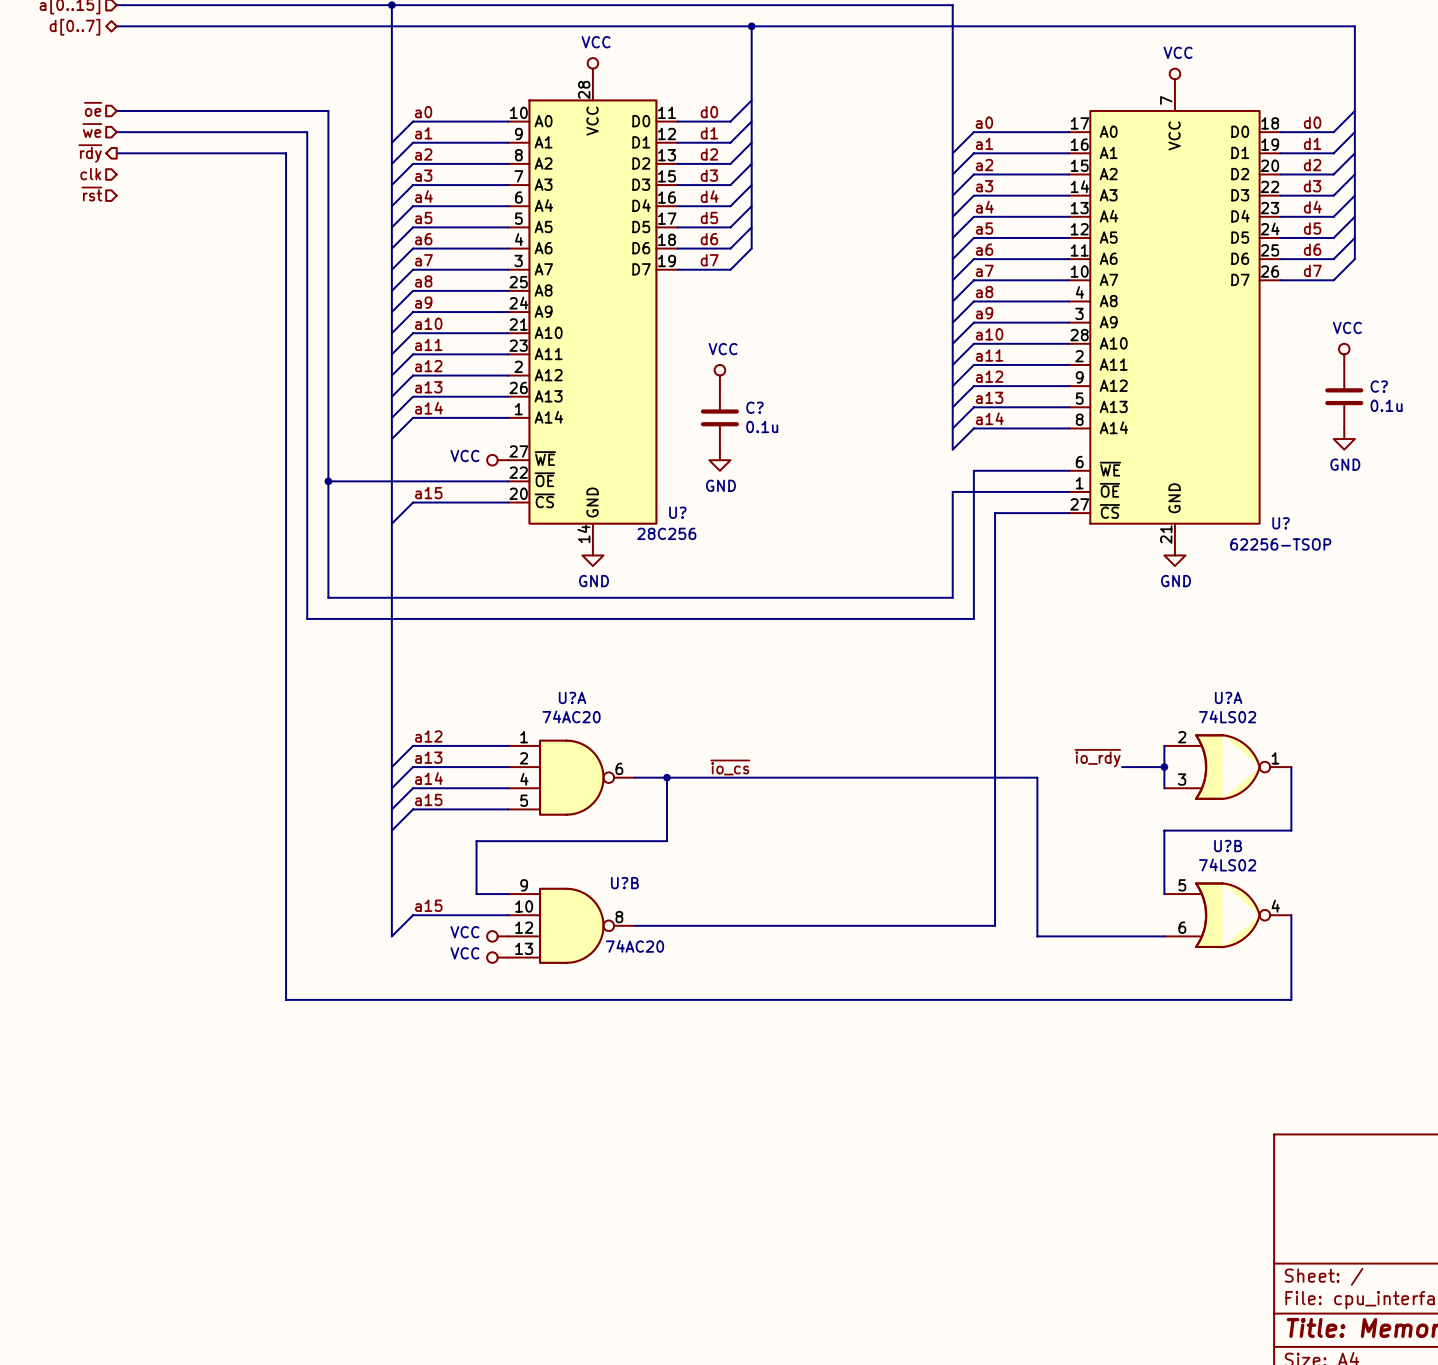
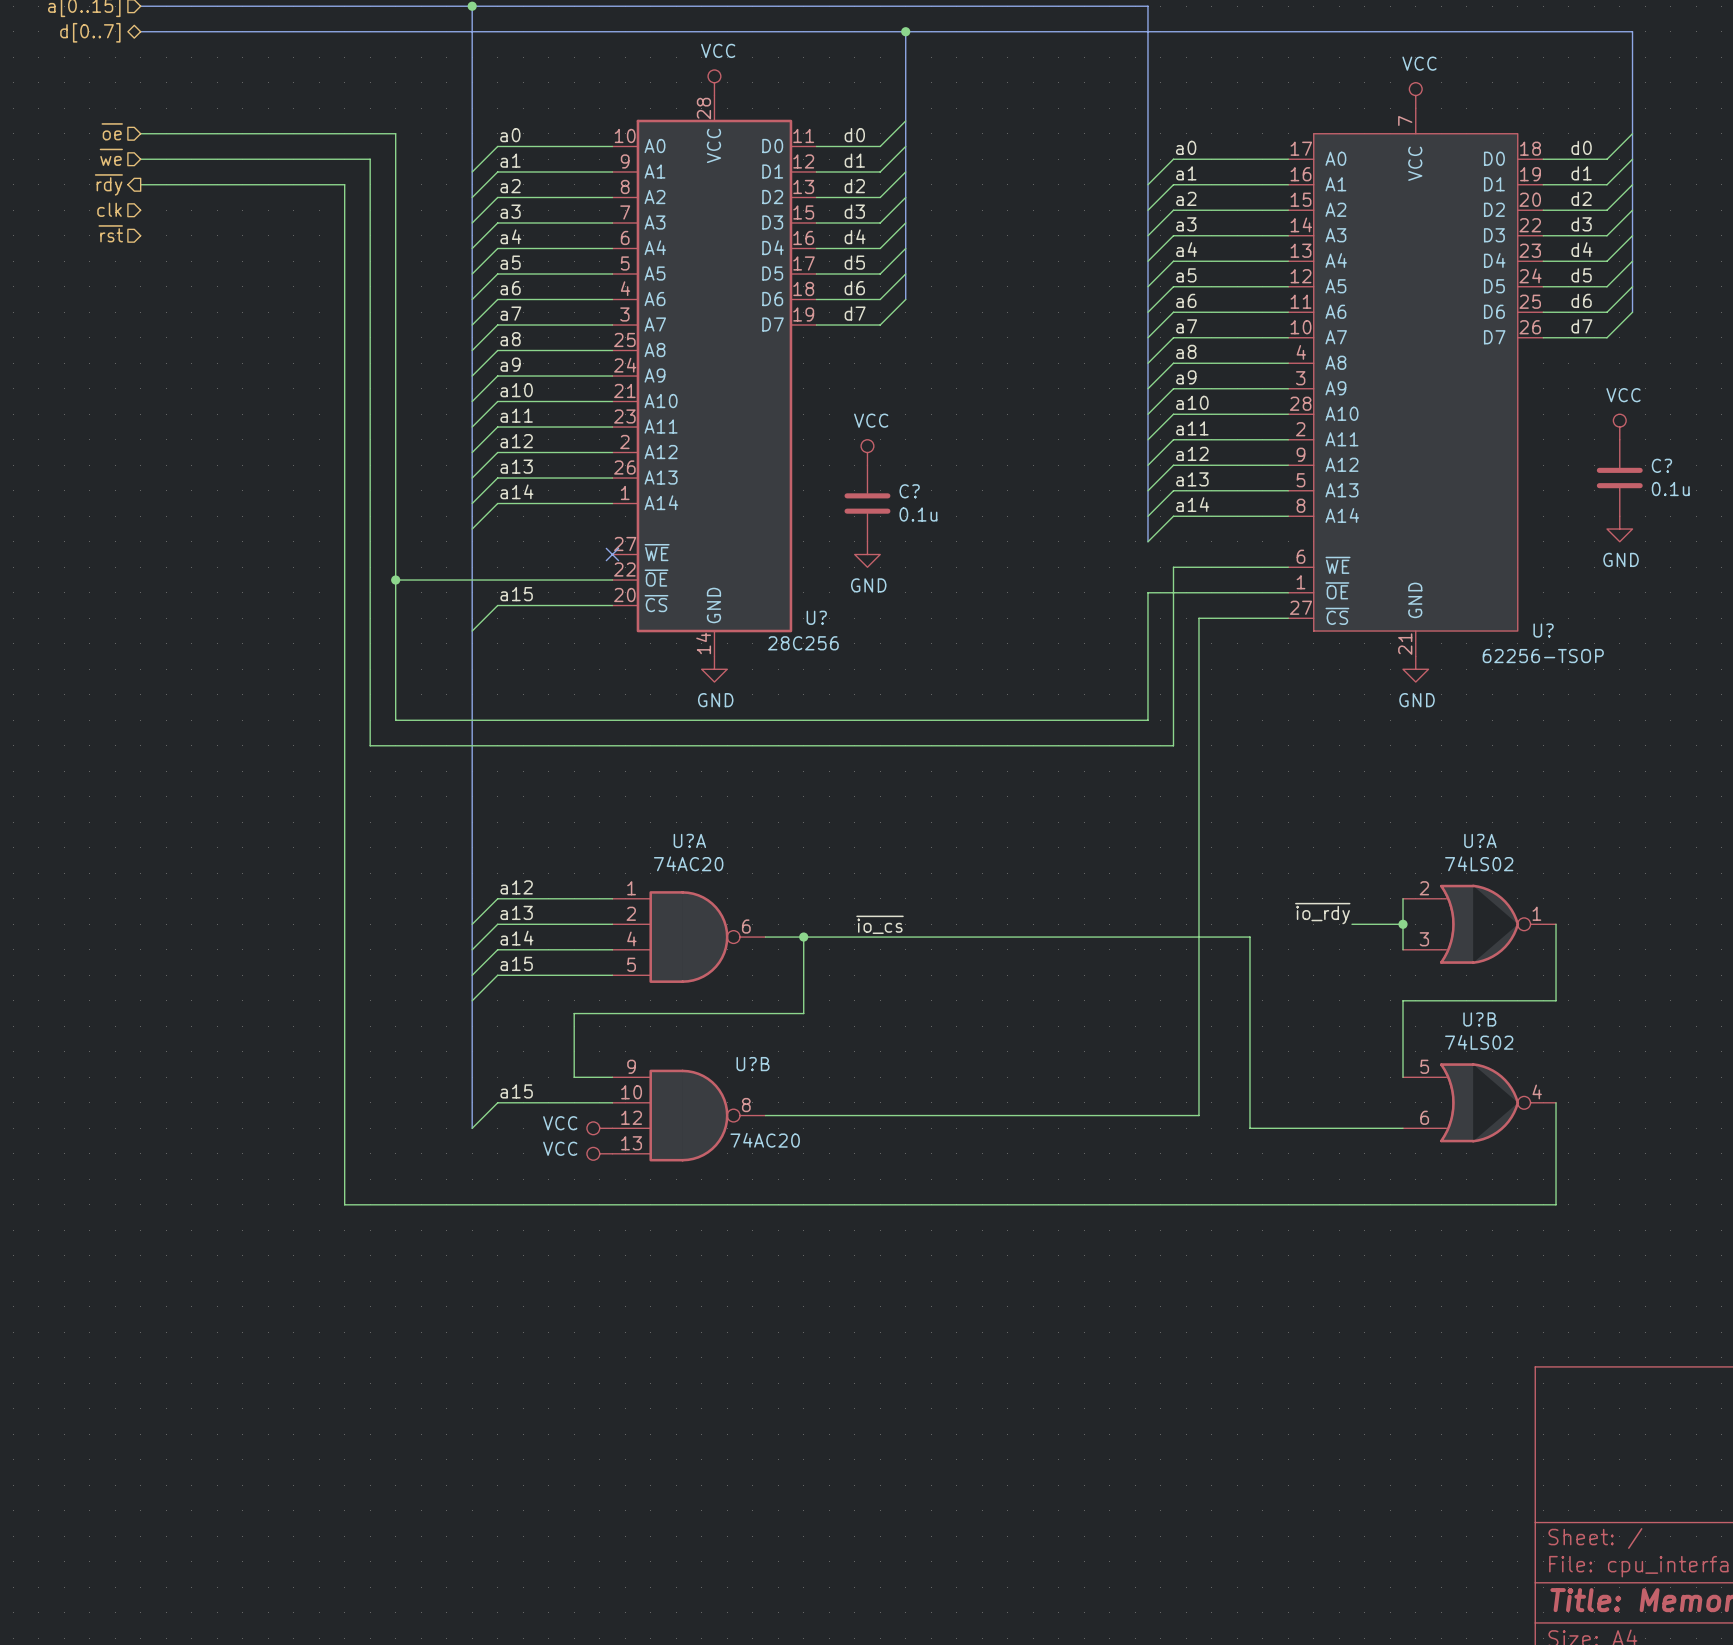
power symbol: VCC (497, 460) -> none
no-connect mark: none -> (612, 554)

